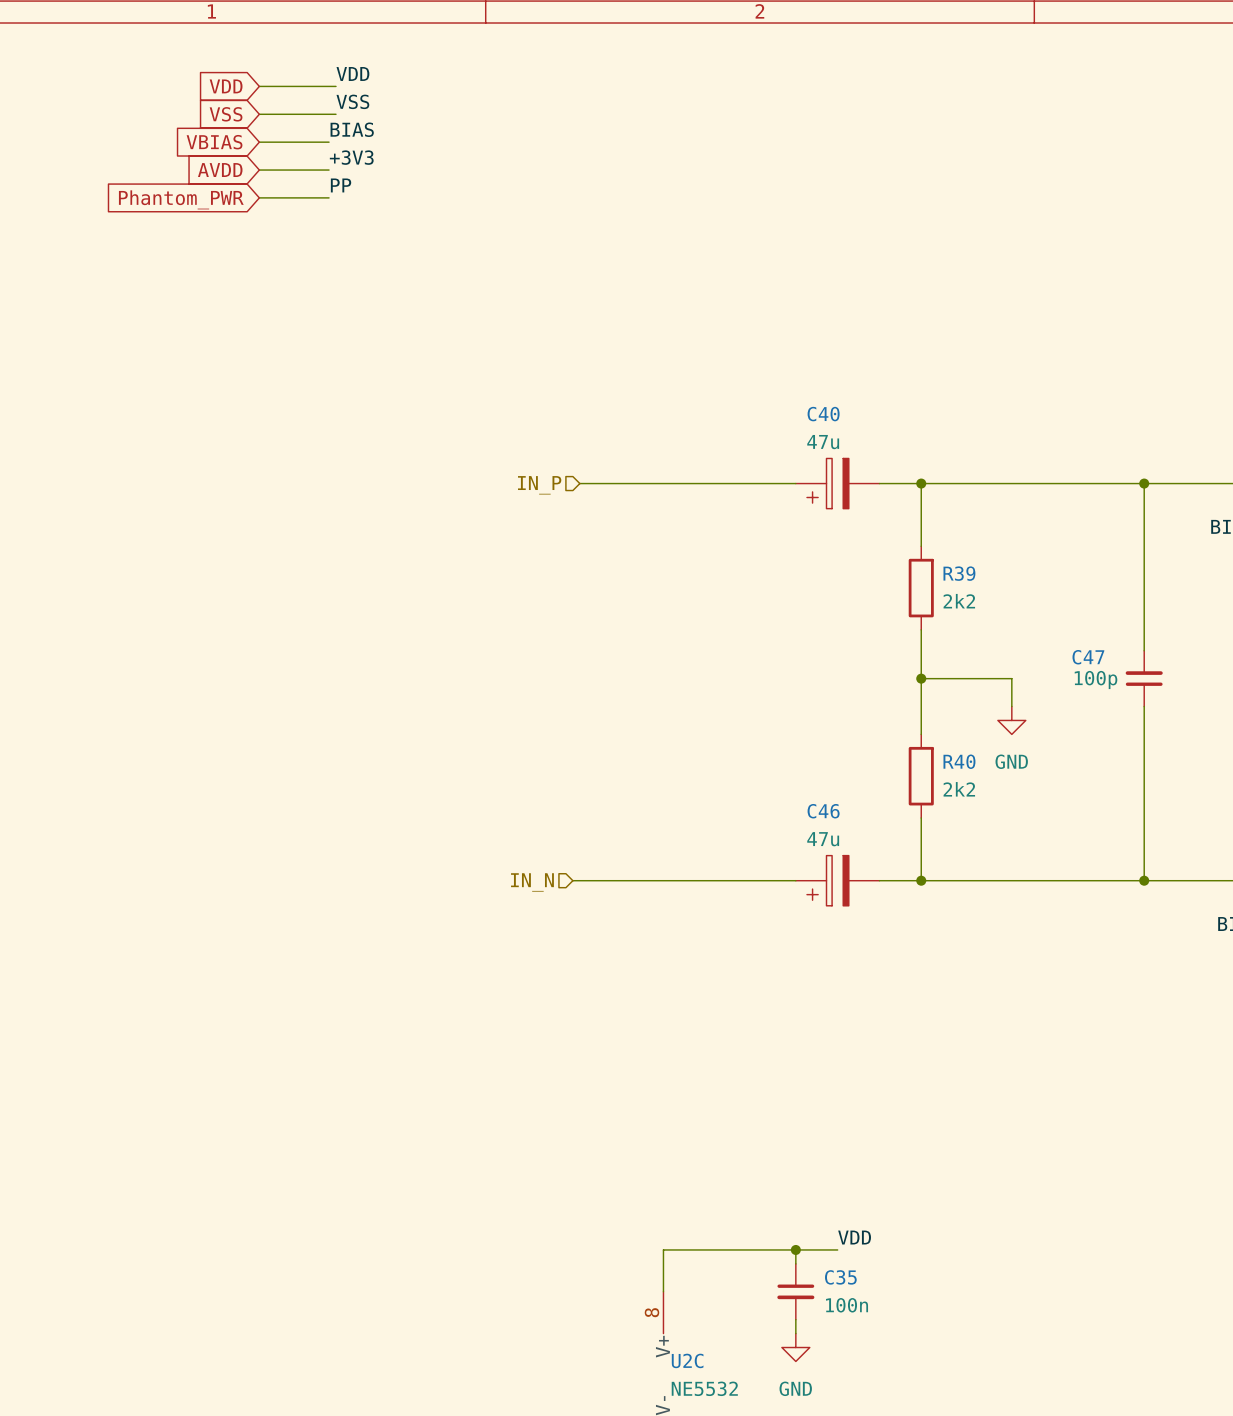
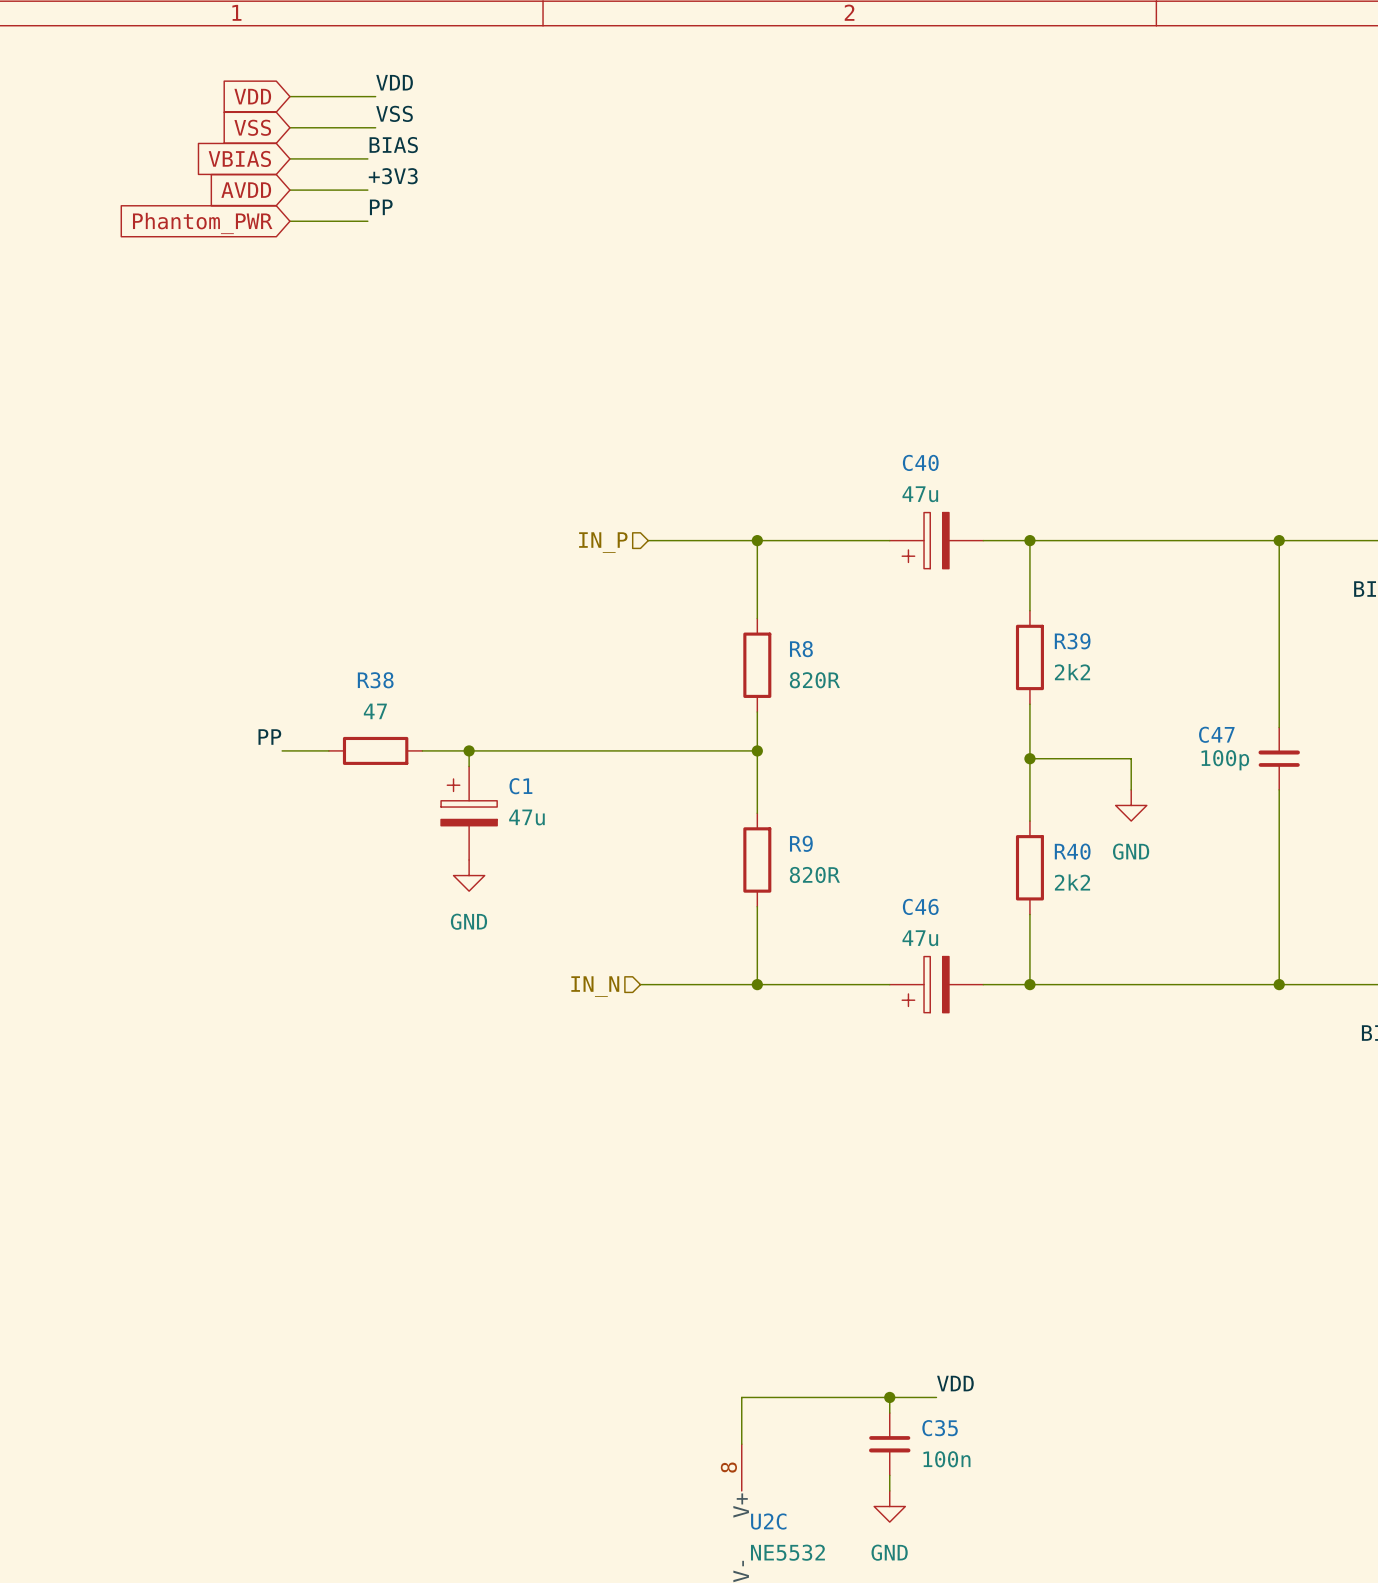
wire: none -> (757, 540) (757, 618)
junction: none -> (757, 540)
R8: none -> 820R (757, 665)
wire: none -> (757, 711) (757, 813)
label: none -> PP (269, 737)
wire: none -> (282, 750) (328, 750)
R38: none -> 47 (375, 750)
wire: none -> (422, 750) (757, 750)
wire: none -> (469, 750) (469, 766)
junction: none -> (469, 750)
junction: none -> (757, 750)
C1: none -> 47u (469, 813)
R9: none -> 820R (757, 859)
power symbol: none -> GND (469, 875)
wire: none -> (757, 906) (757, 984)
junction: none -> (757, 984)

